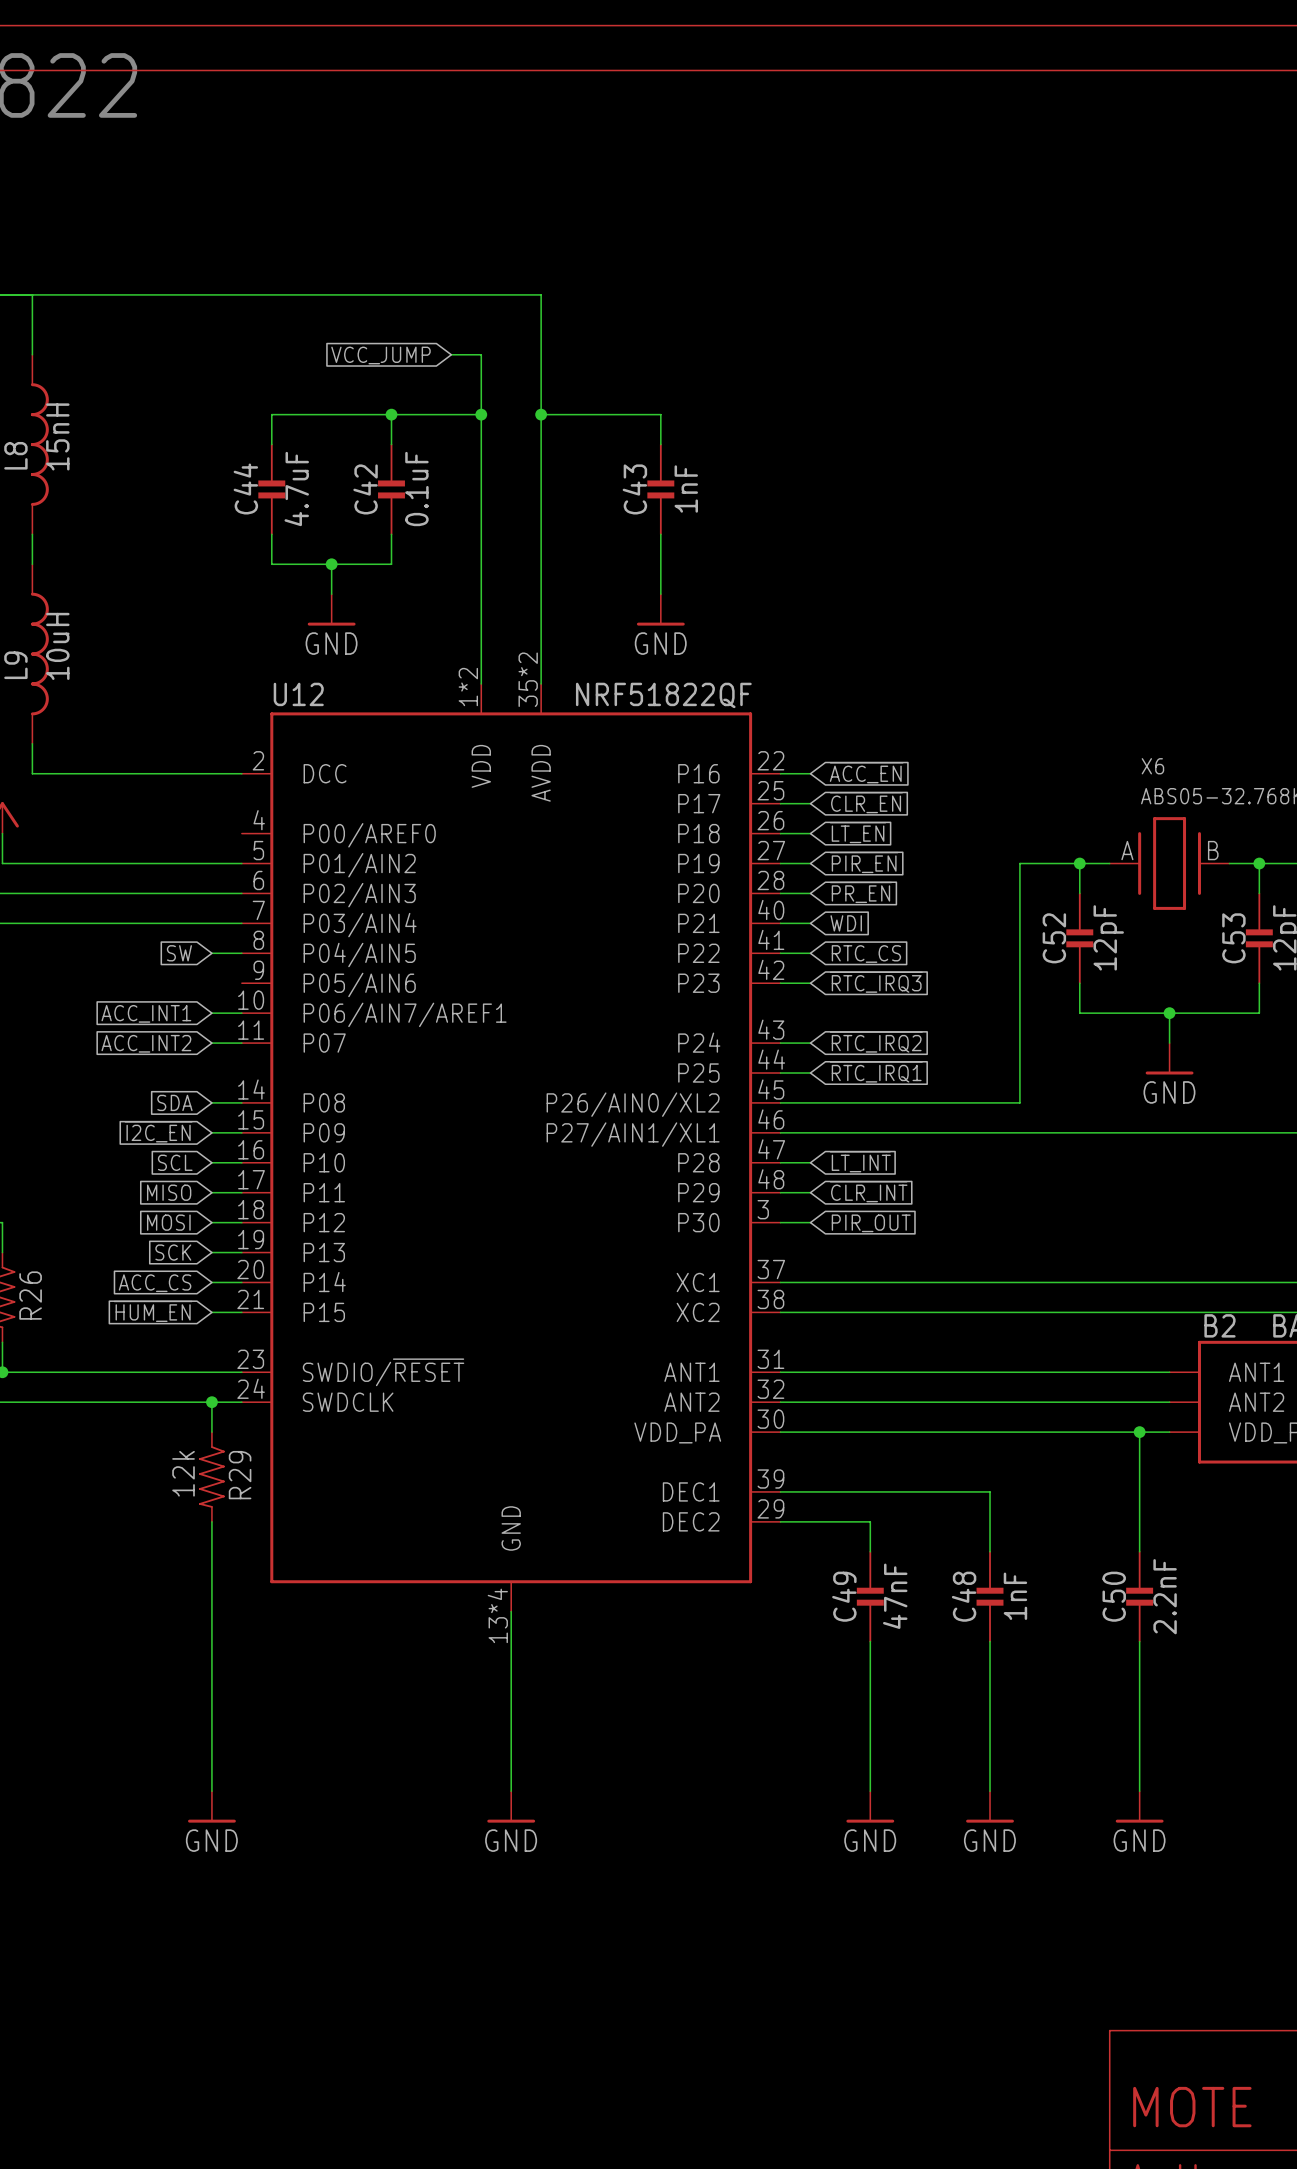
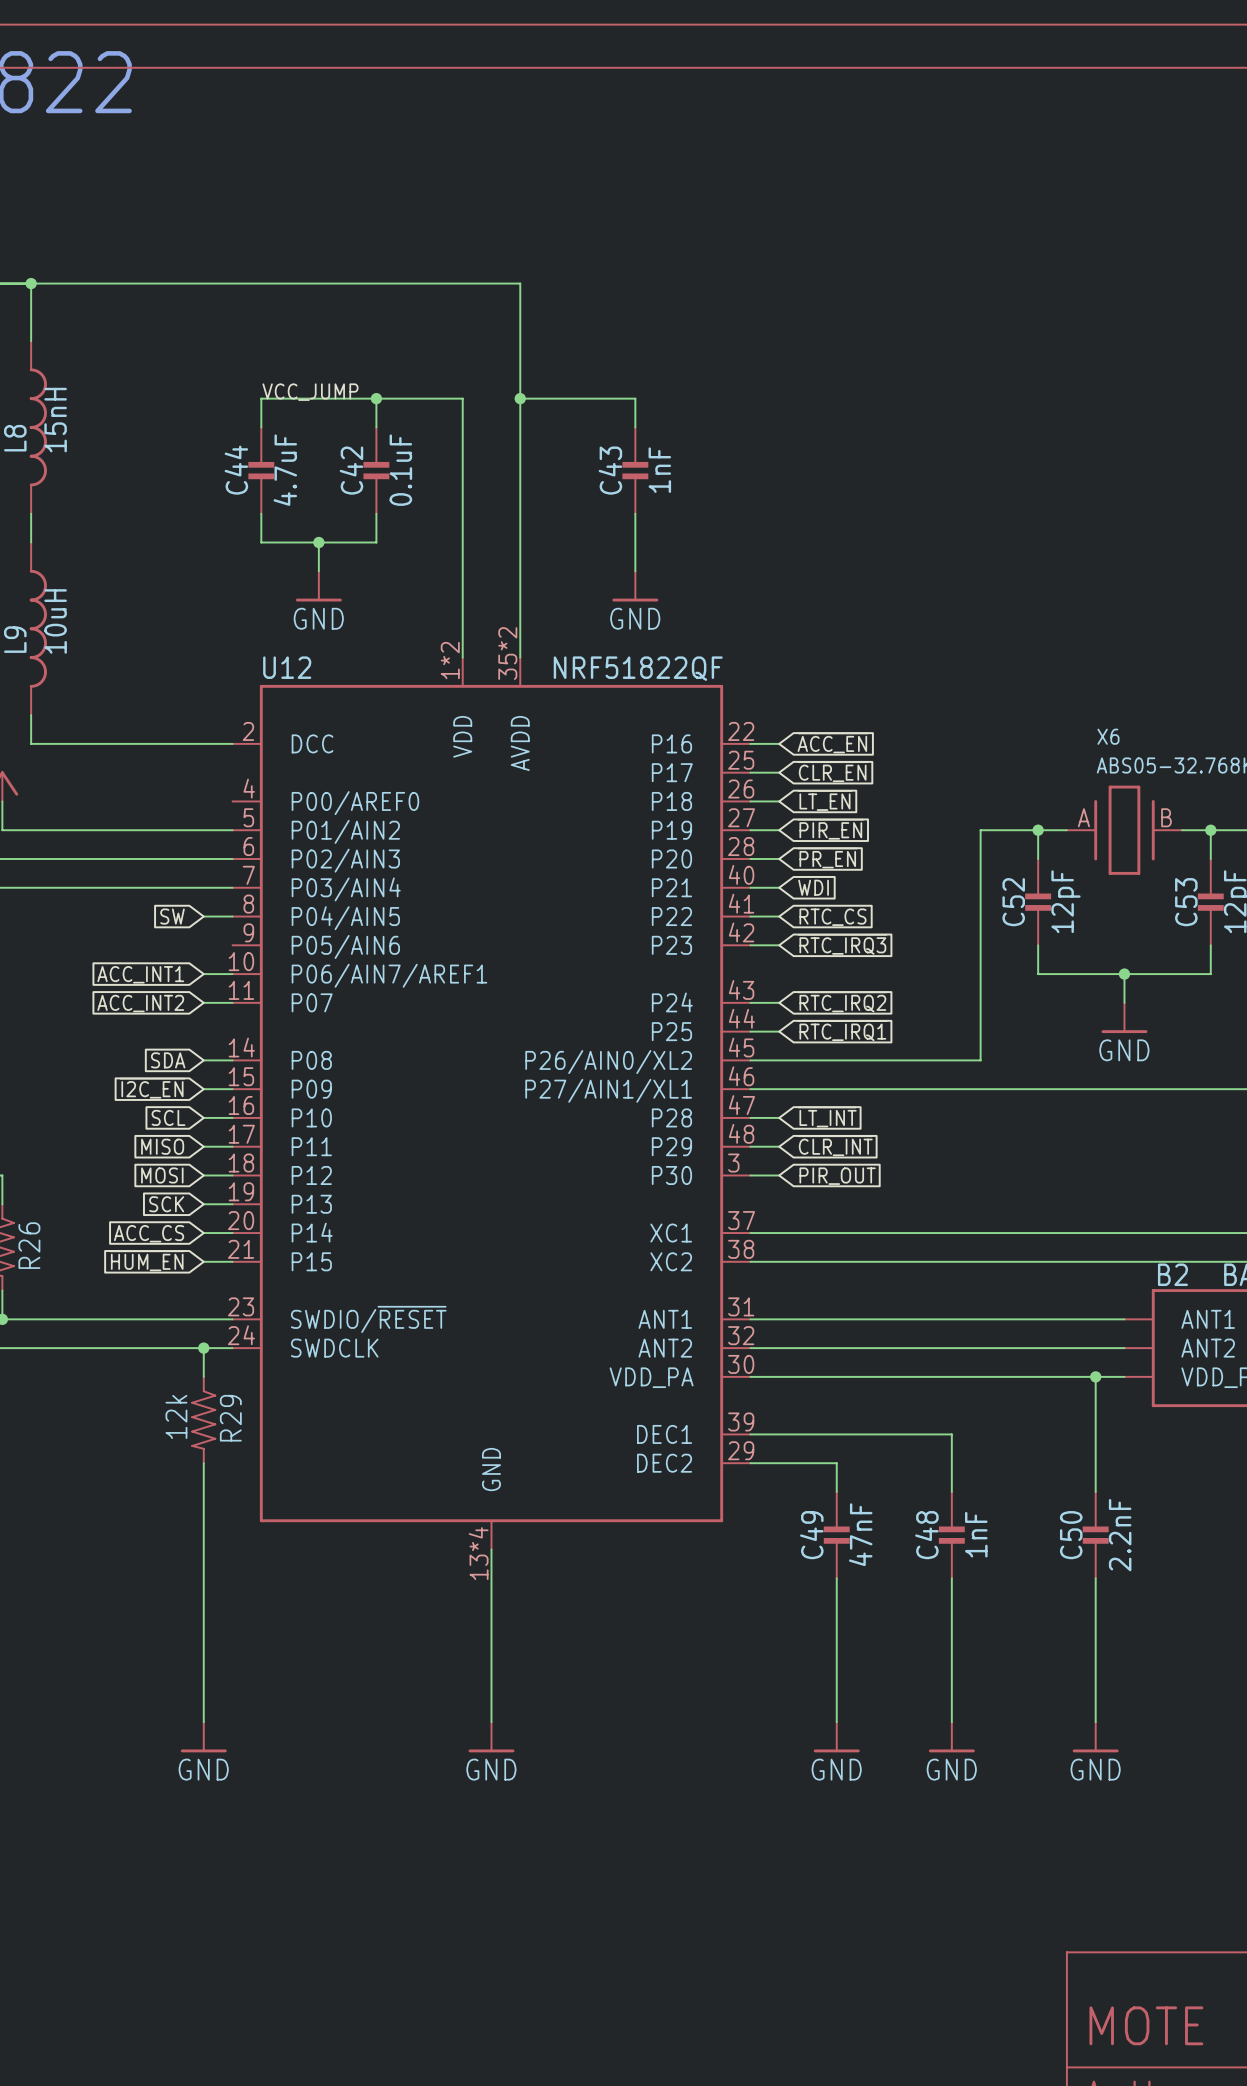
junction: none -> (31, 283)
wire: (451, 354) (481, 354) (481, 414) -> none
global label: VCC_JUMP (380, 355) -> none
label: none -> VCC_JUMP (310, 392)
junction: (481, 414) -> none

